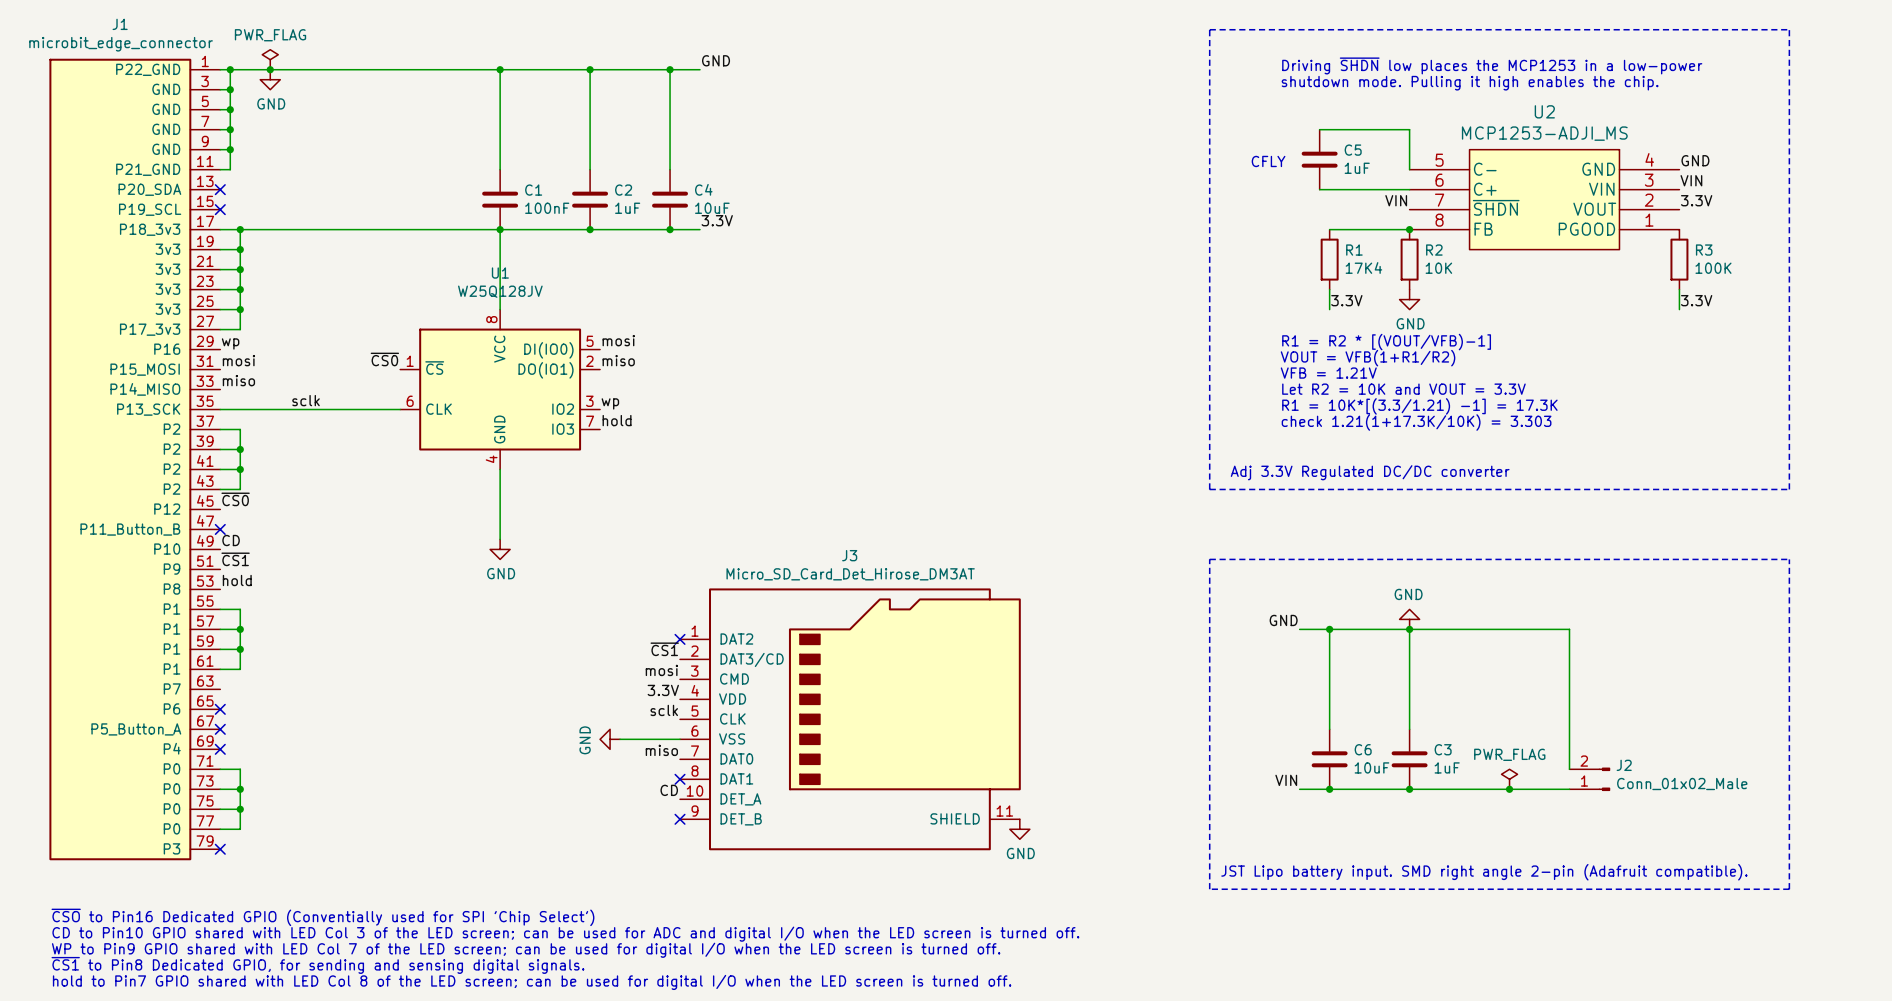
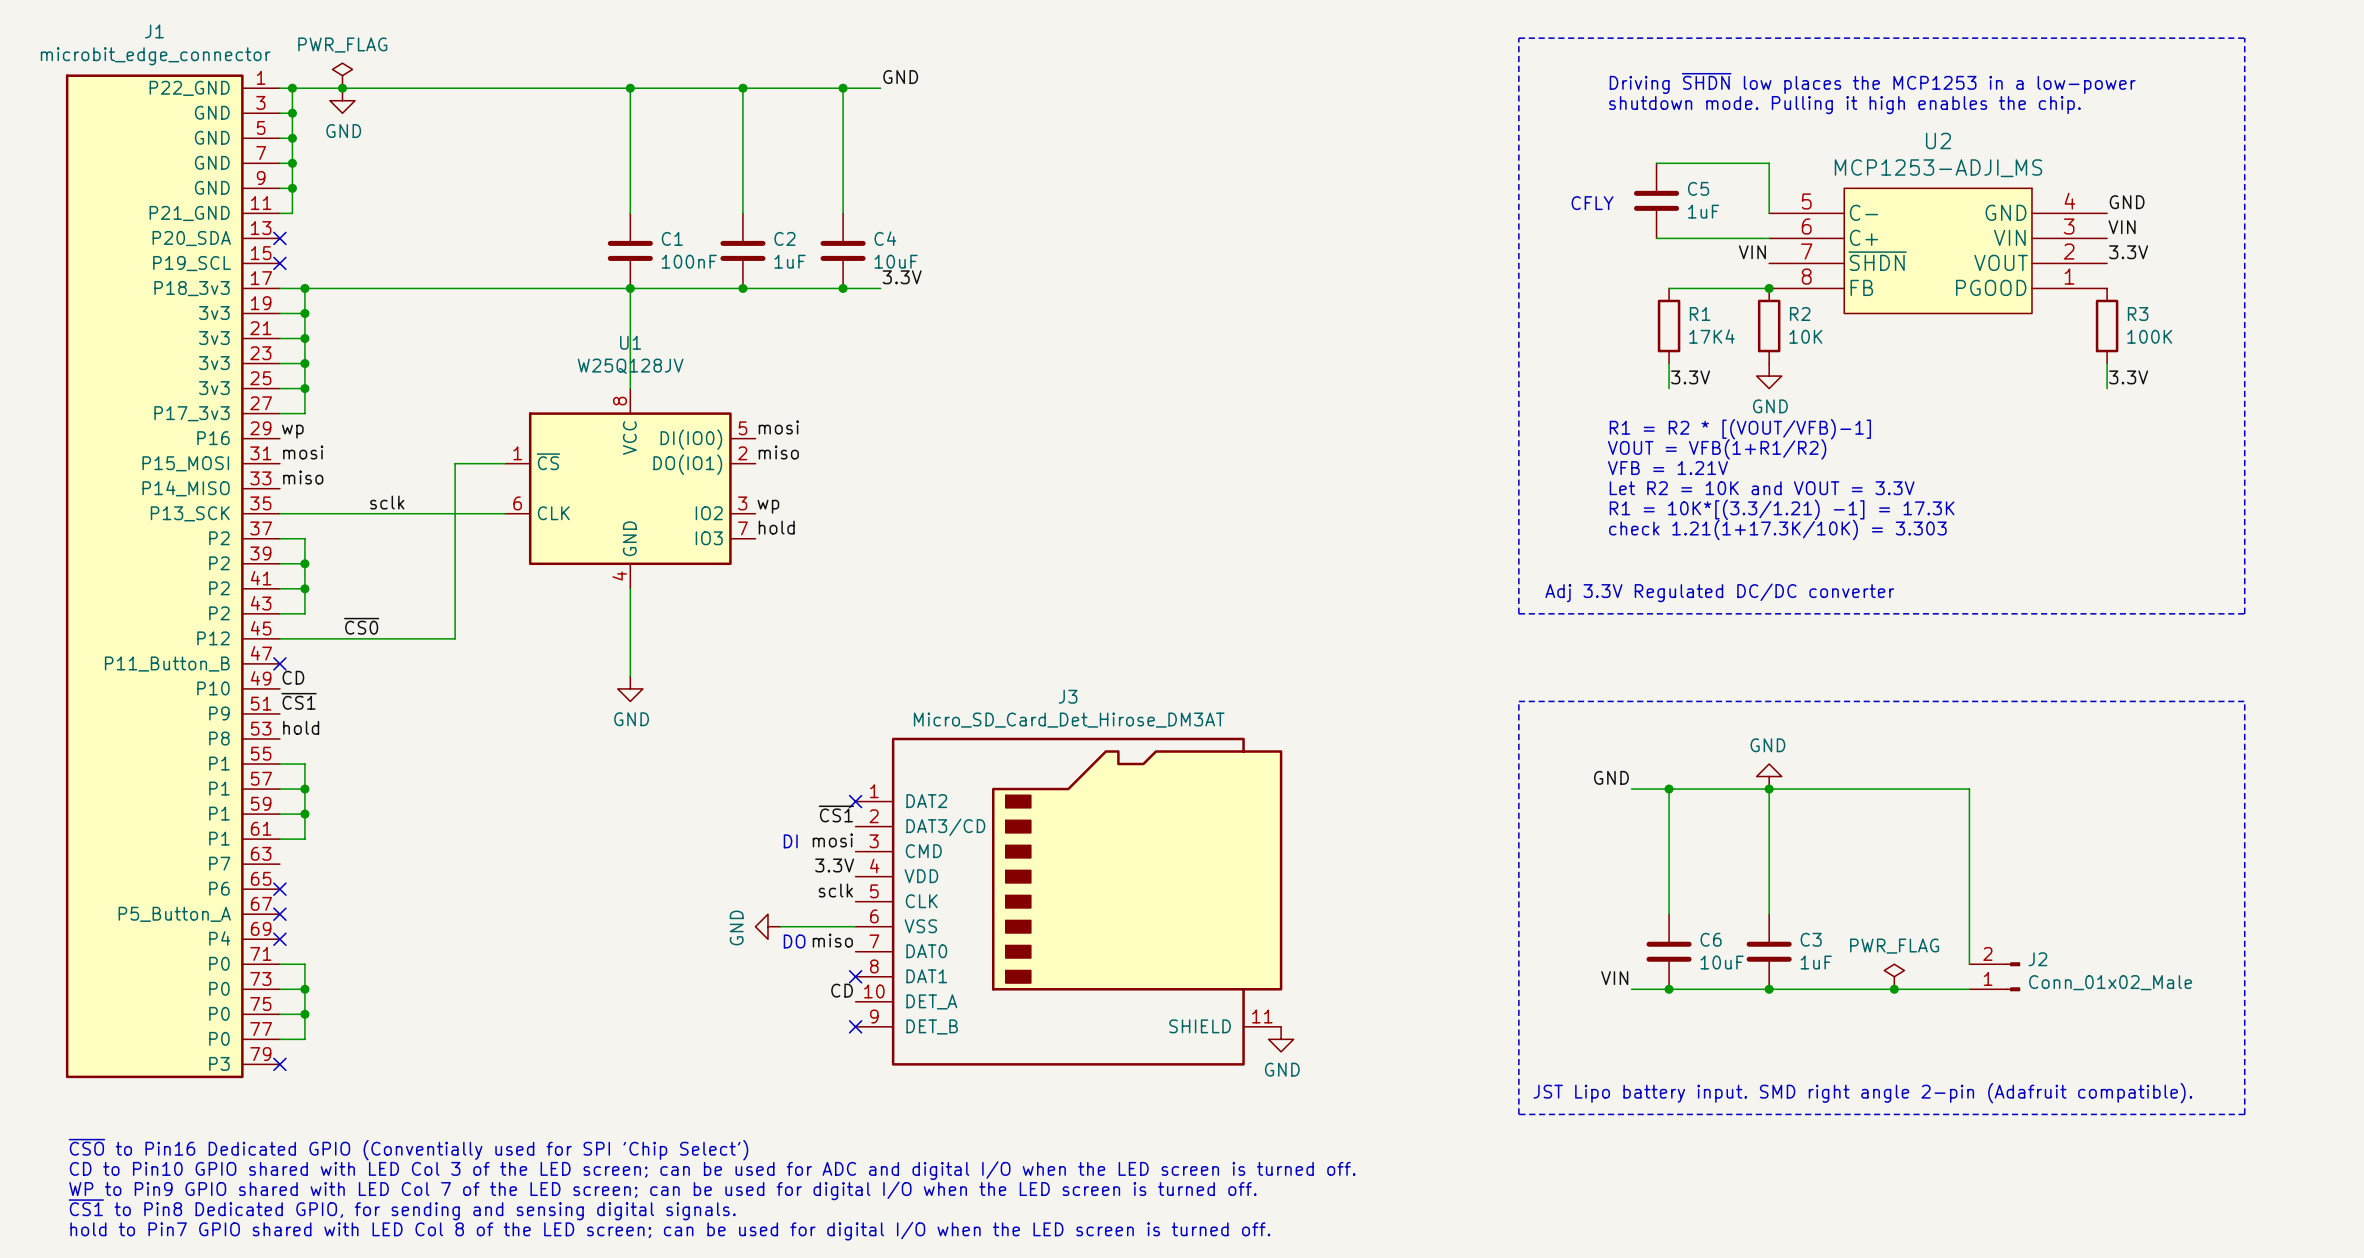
label: ~{CS0} (384, 359) -> none
wire: none -> (505, 463) (455, 463) (455, 638) (279, 638)
label position: ~{CS0} (235, 499) -> ~{CS0} (361, 626)
text: none -> DI (790, 841)
text: none -> DO (794, 941)

